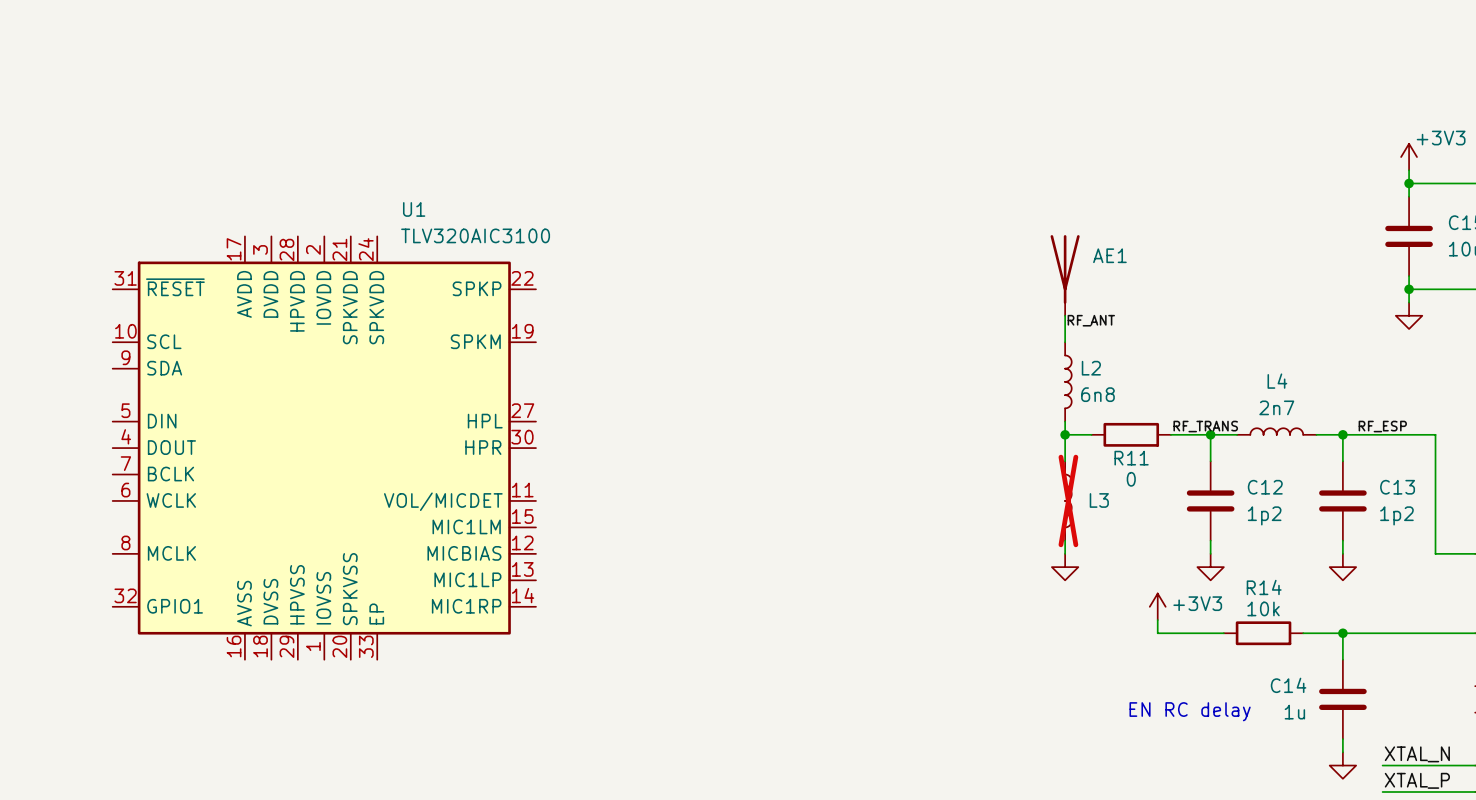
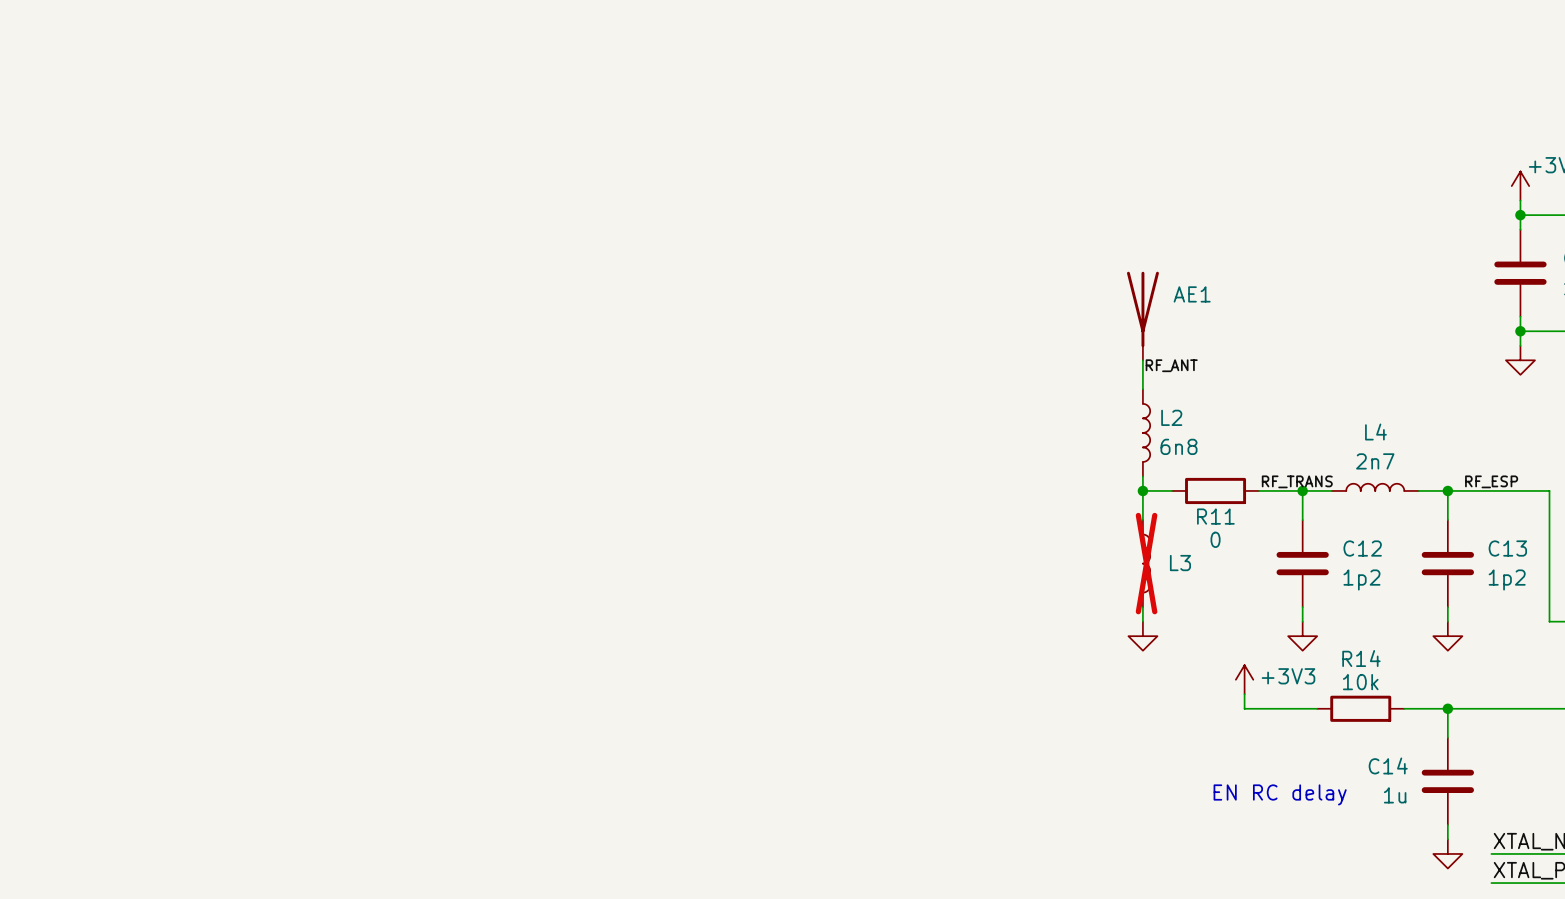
U1: TLV320AIC3100 (324, 448) -> none

